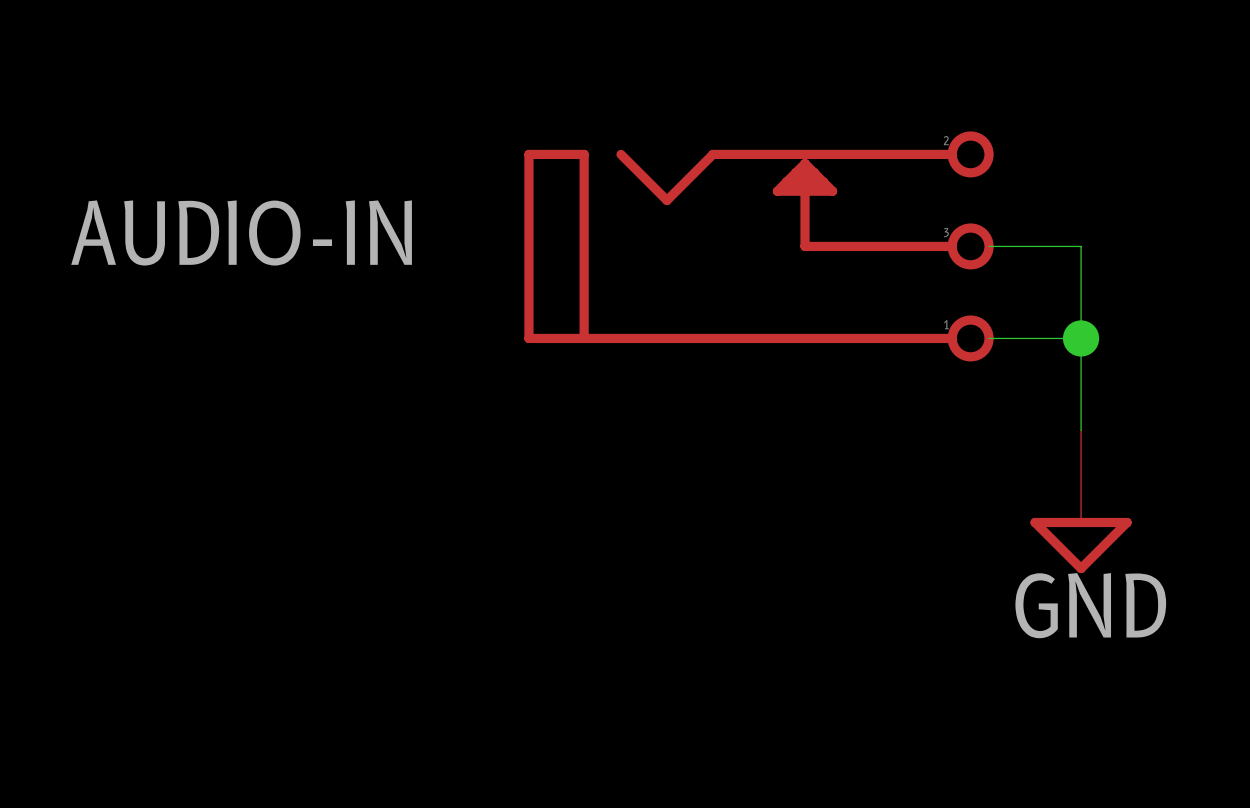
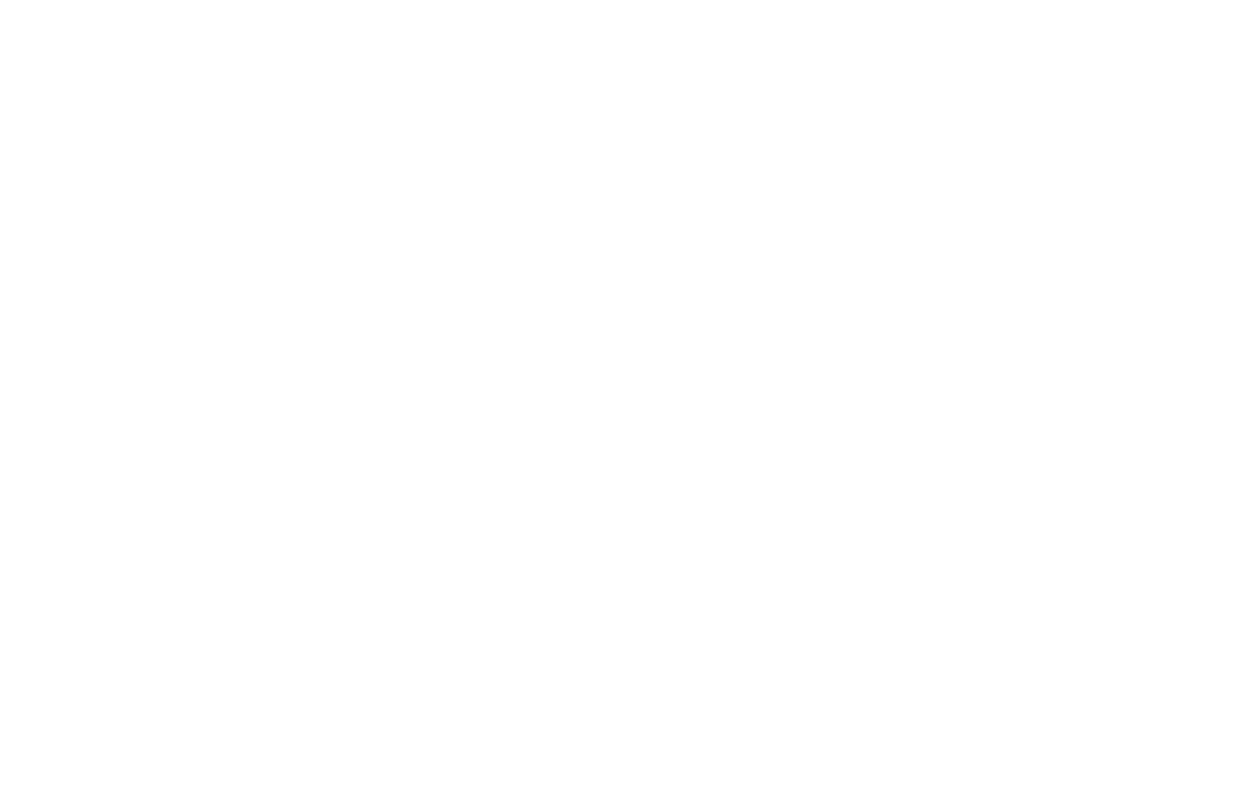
AUDIO-IN: (759, 246) -> none
wire: (989, 246) (1081, 246) (1081, 430) -> none
wire: (989, 338) (1081, 338) -> none
junction: (1081, 338) -> none
power symbol: GND (1081, 501) -> none

